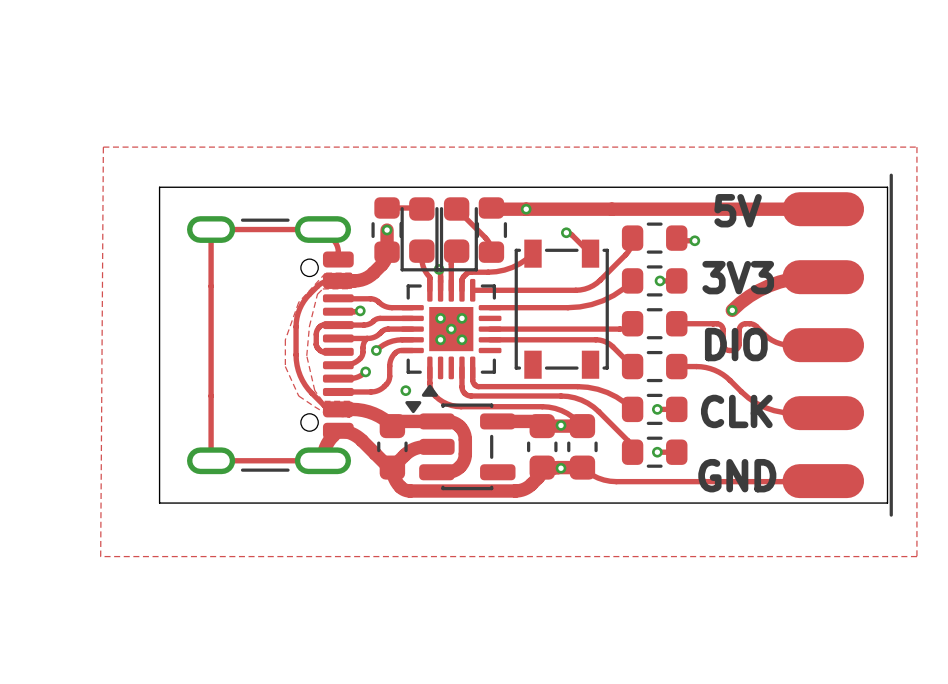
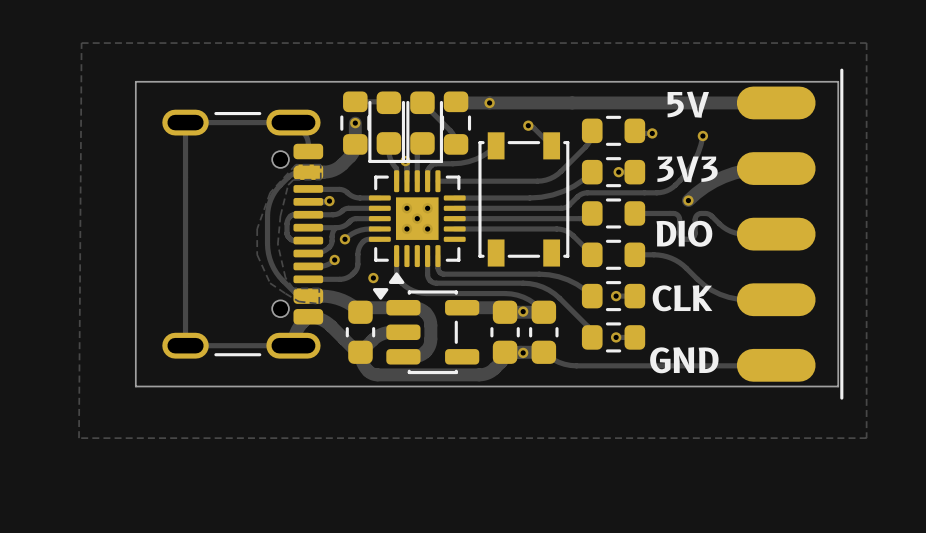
track: none -> (702, 136) (698, 152) (690, 167) (675, 185) (663, 191) (584, 193) (562, 208) (454, 208)
via: none -> (702, 136)

